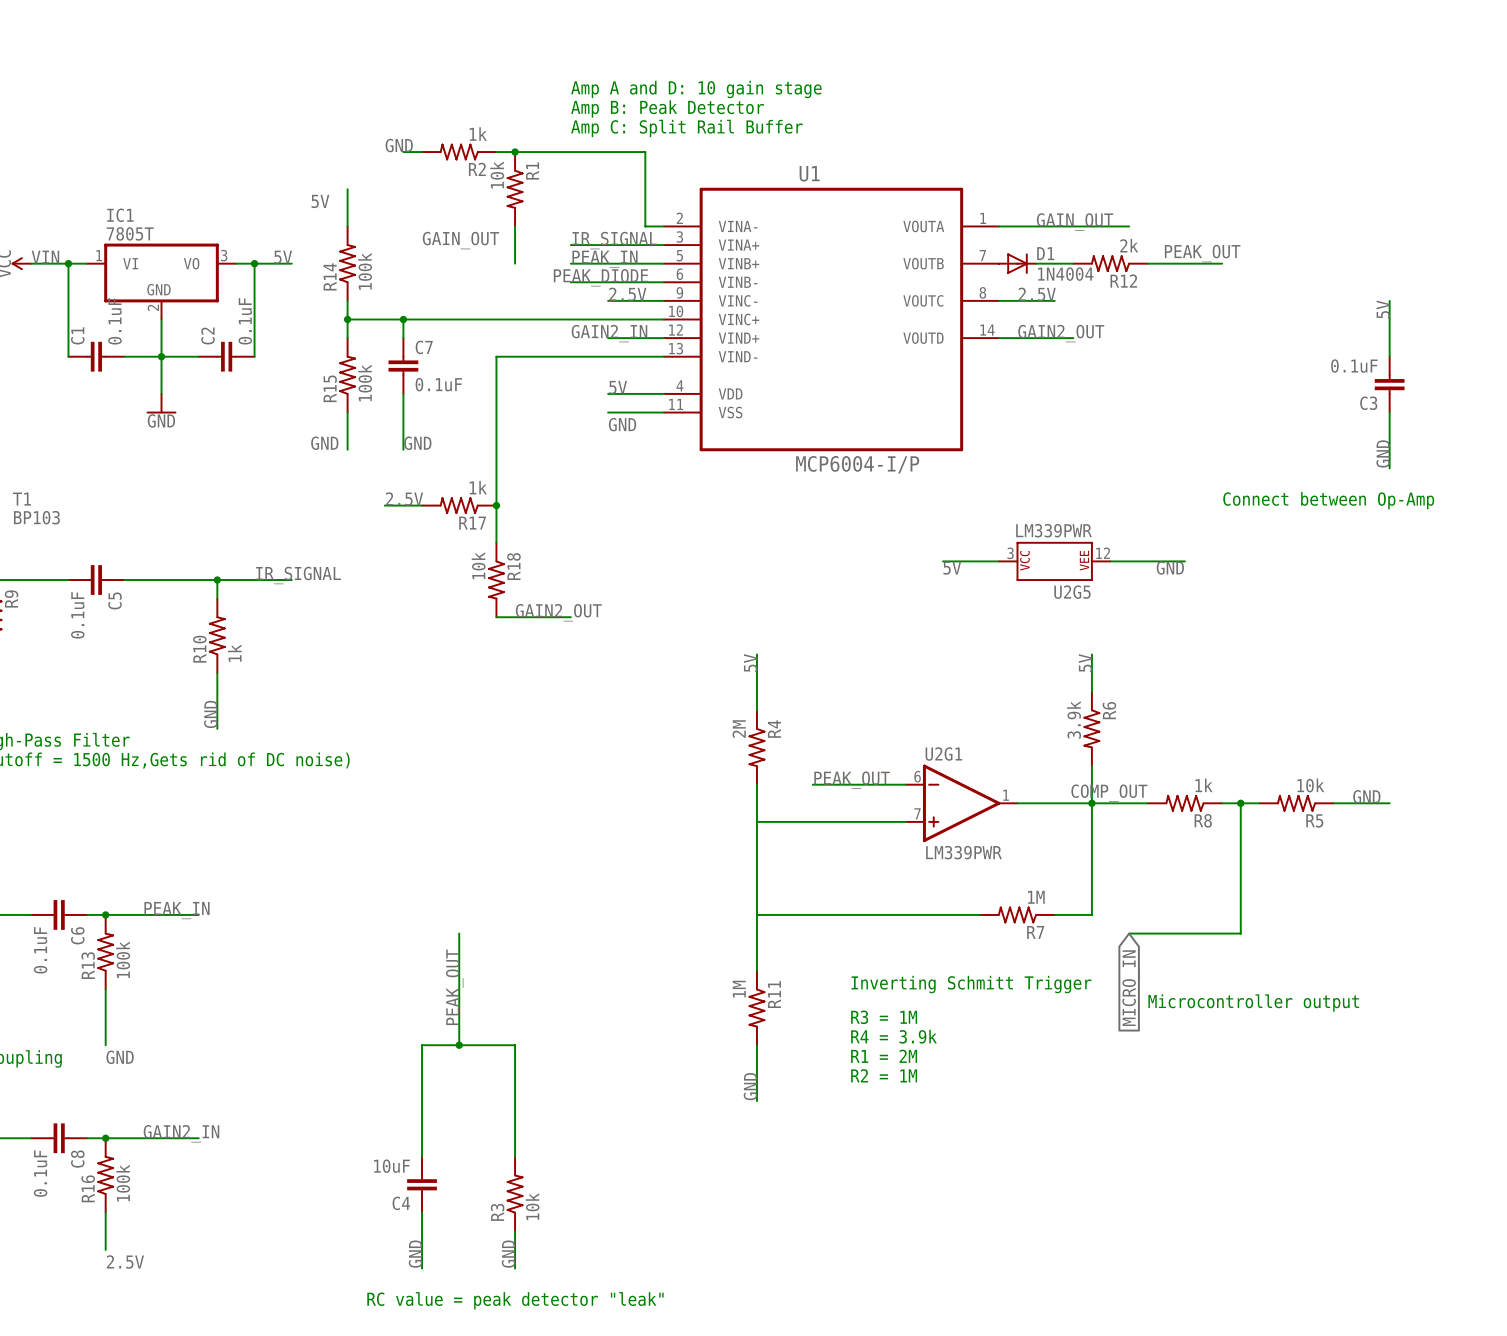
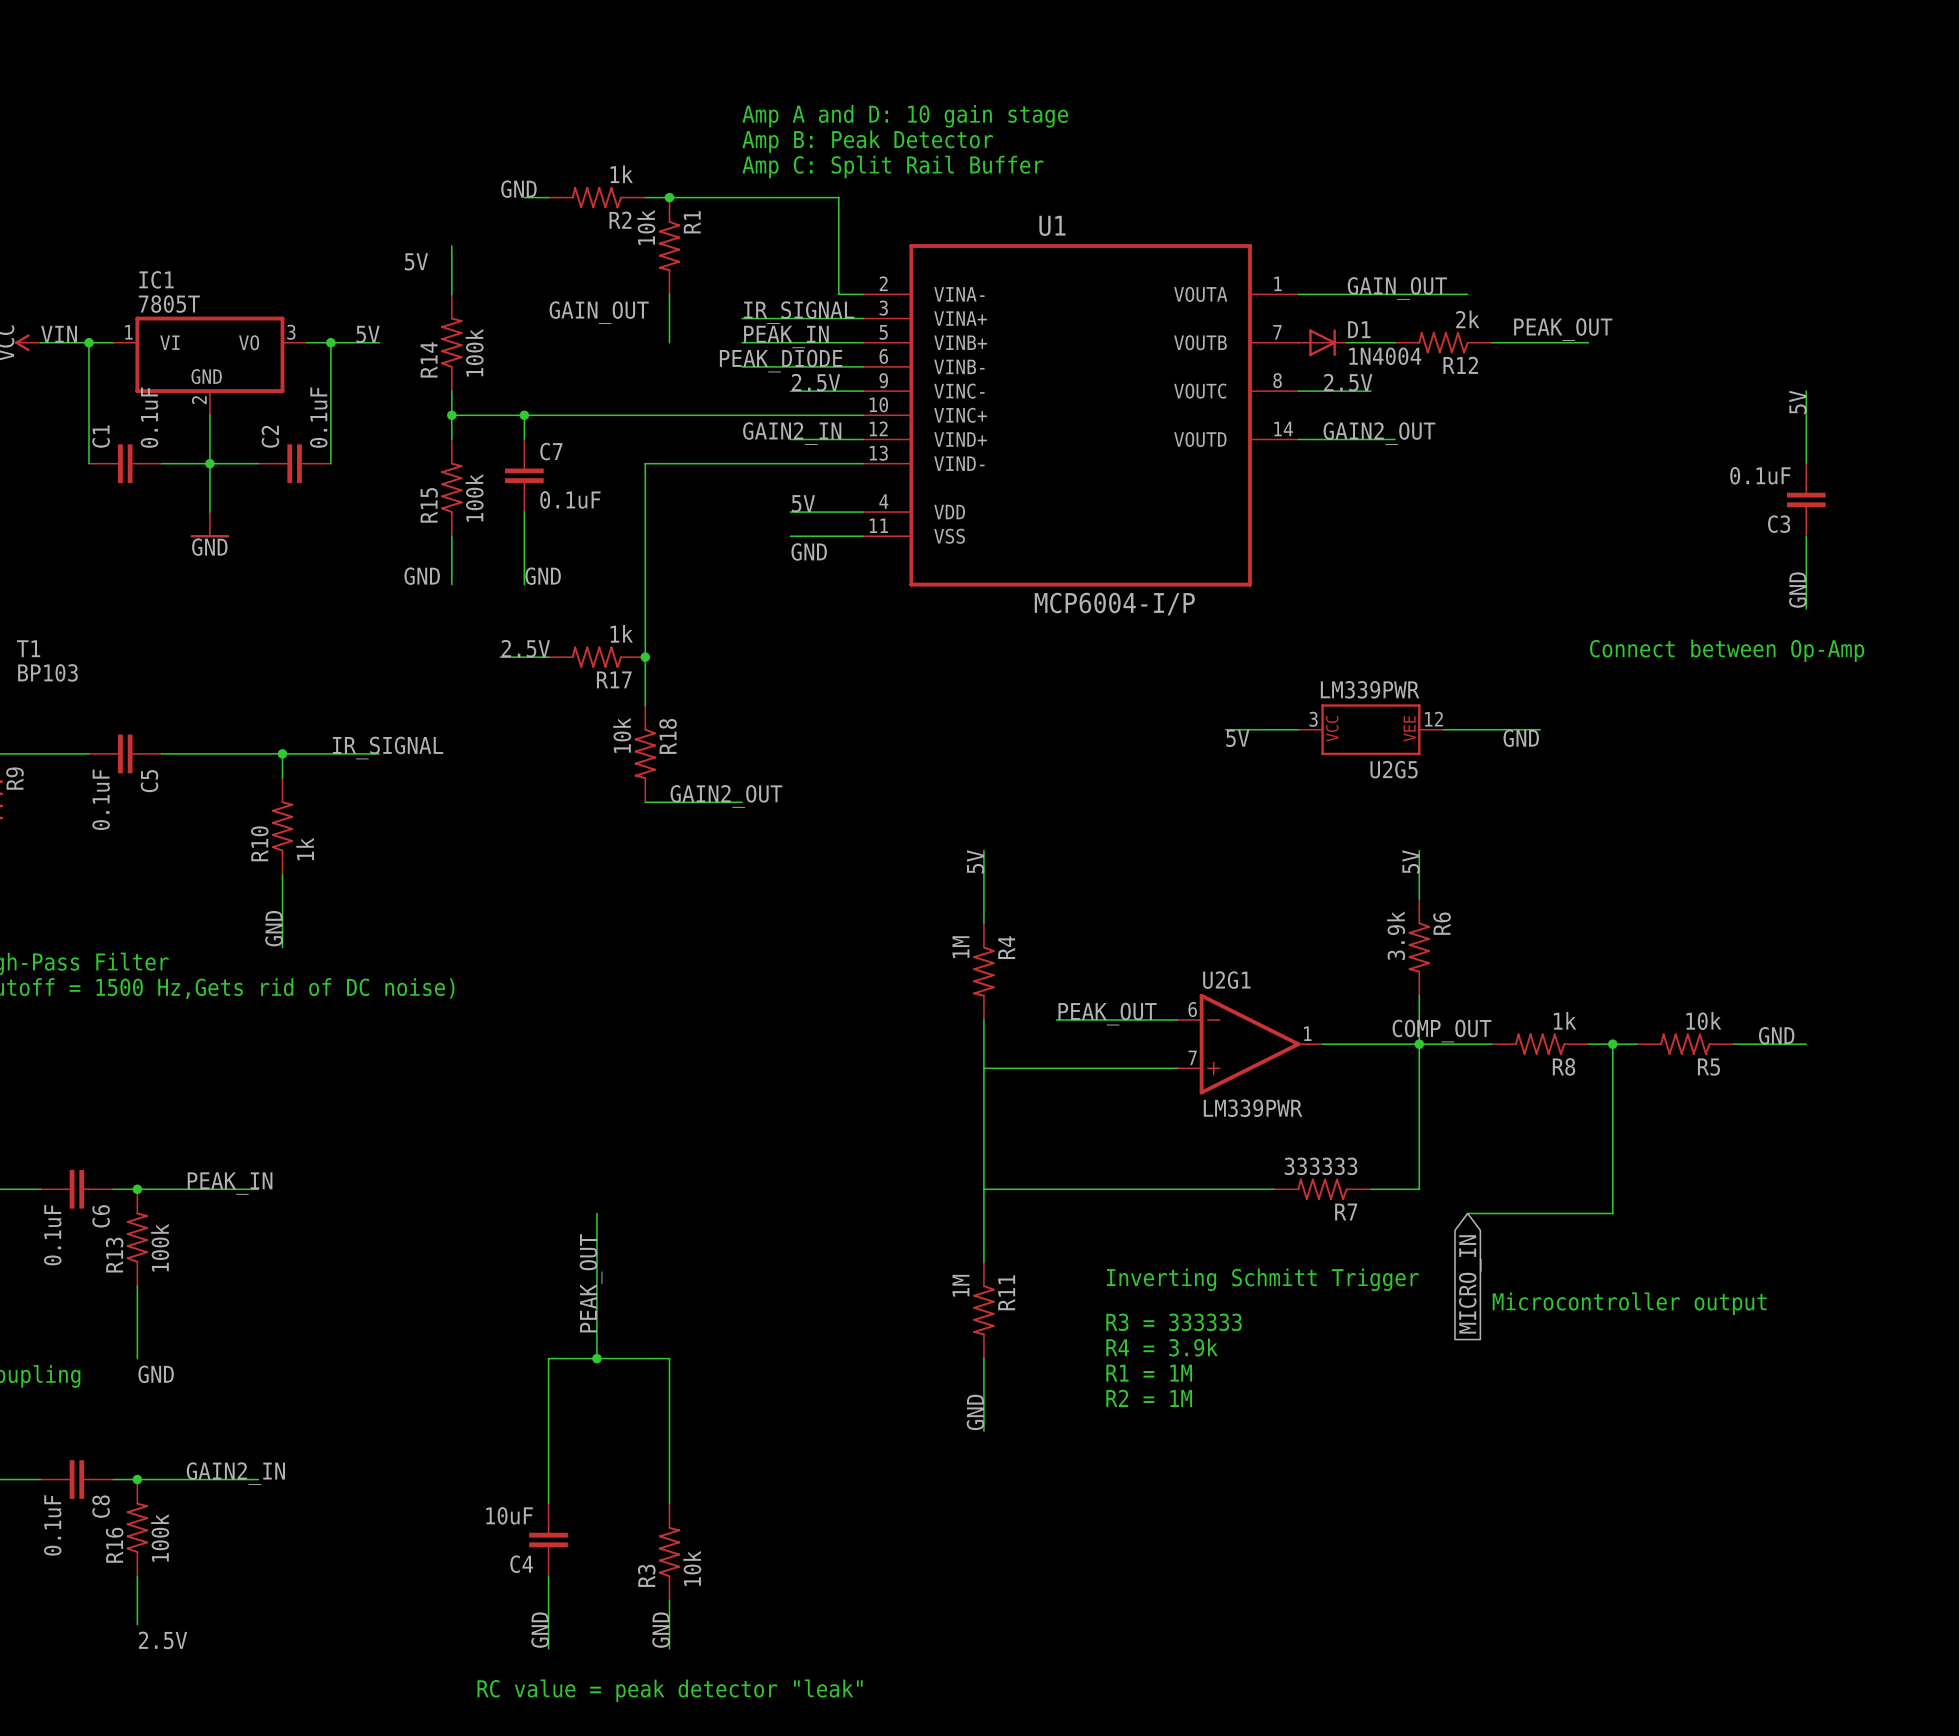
R4 value: 2M (739, 729) -> 1M (960, 947)
R7 value: 1M (1036, 897) -> 333333 (1321, 1166)
text: R3 = 1M (884, 1017) -> R3 = 333333 (1174, 1322)
text: R1 = 2M (884, 1056) -> R1 = 1M (1149, 1373)

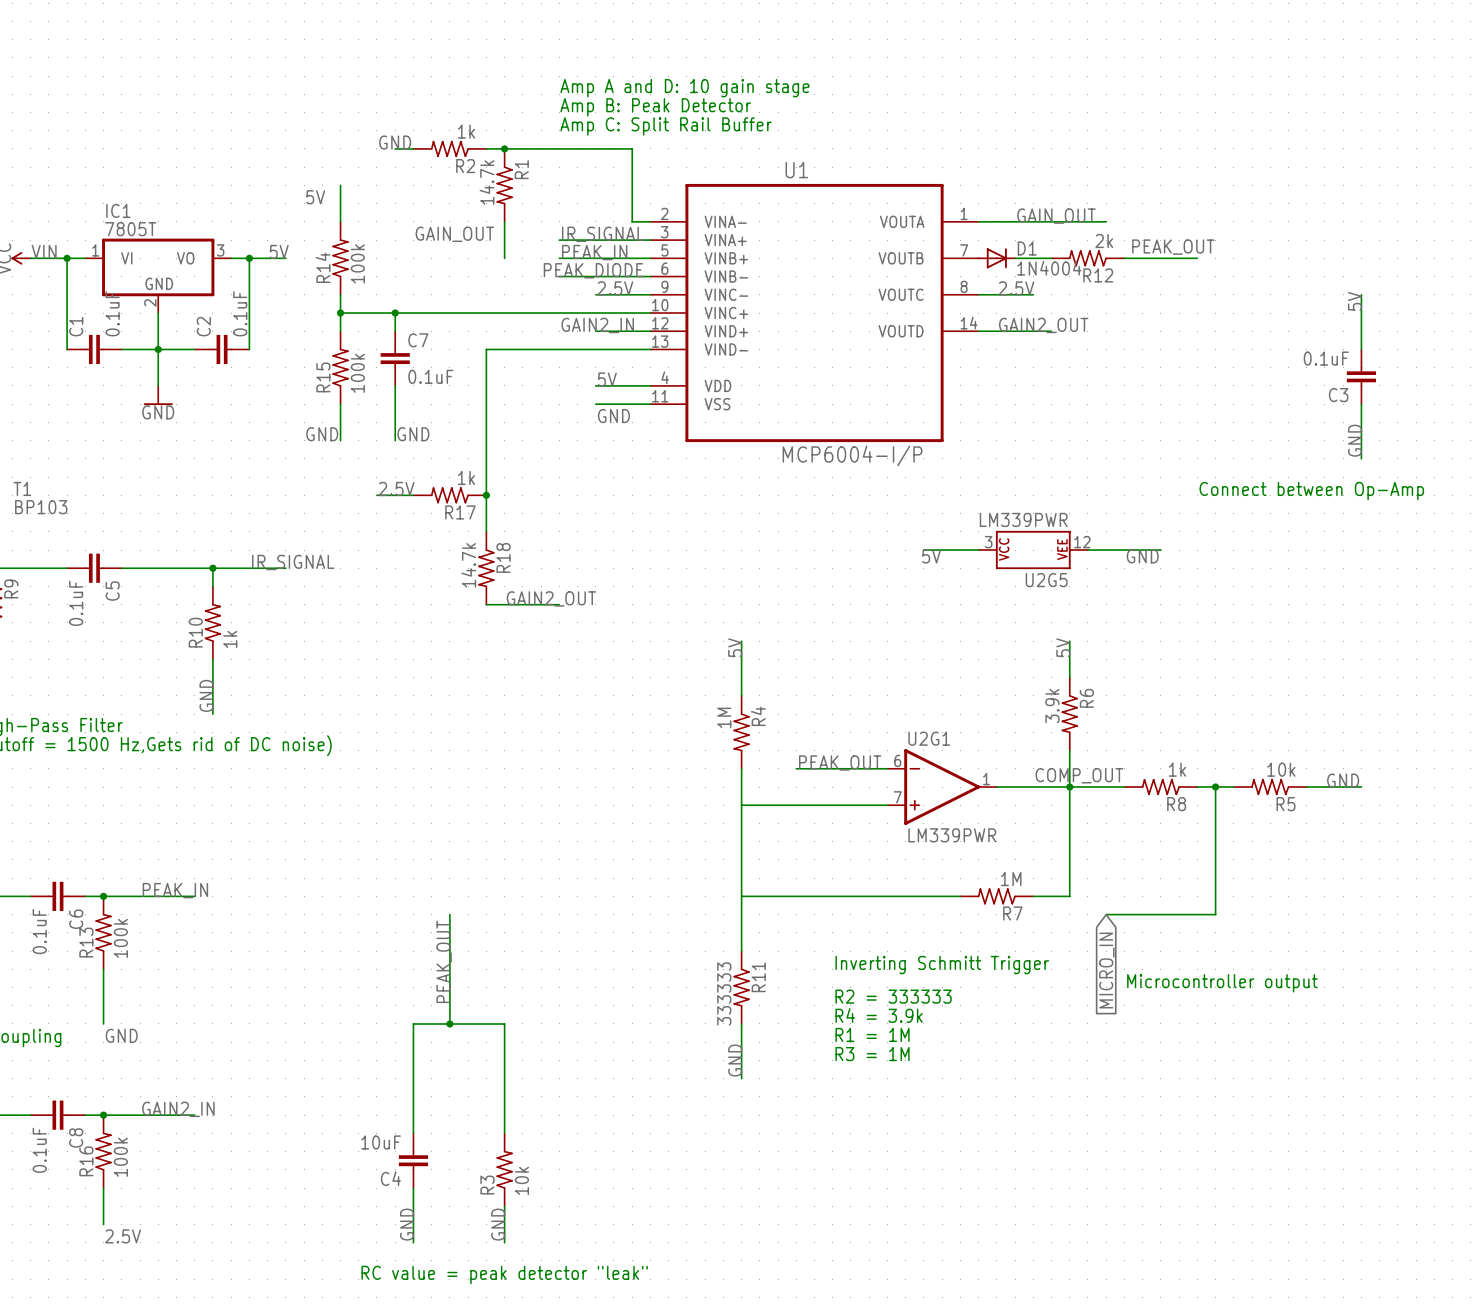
R1 value: 10k (646, 227) -> 14.7k (486, 182)
R18 value: 10k (622, 735) -> 14.7k (468, 565)
R7 value: 333333 (1321, 1166) -> 1M (1011, 879)
R11 value: 1M (960, 1285) -> 333333 (724, 993)
text: R3 = 333333 (1174, 1322) -> R2 = 333333 (893, 996)
text: R2 = 1M (1149, 1398) -> R3 = 1M (872, 1054)

